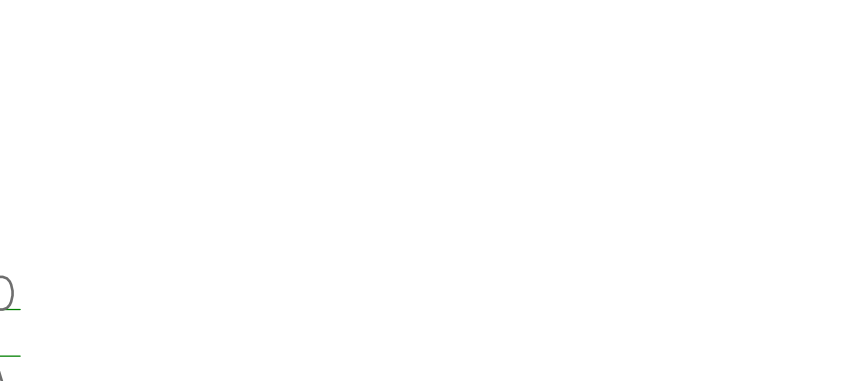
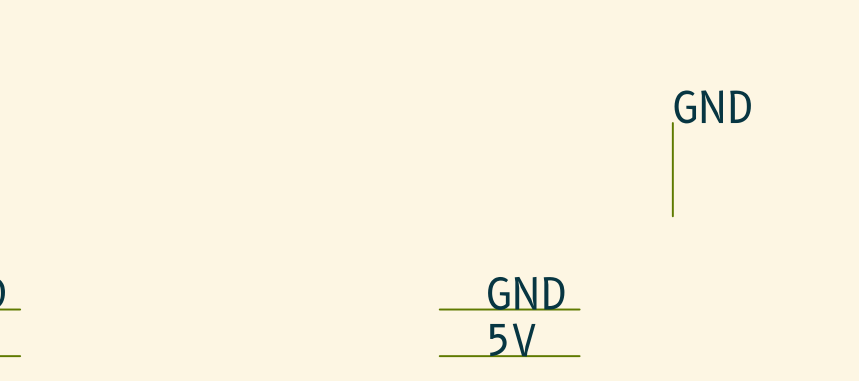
label: none -> GND (712, 106)
wire: none -> (672, 123) (672, 216)
label: none -> GND (526, 293)
wire: none -> (439, 309) (579, 309)
label: none -> 5V (512, 340)
wire: none -> (439, 356) (579, 356)

